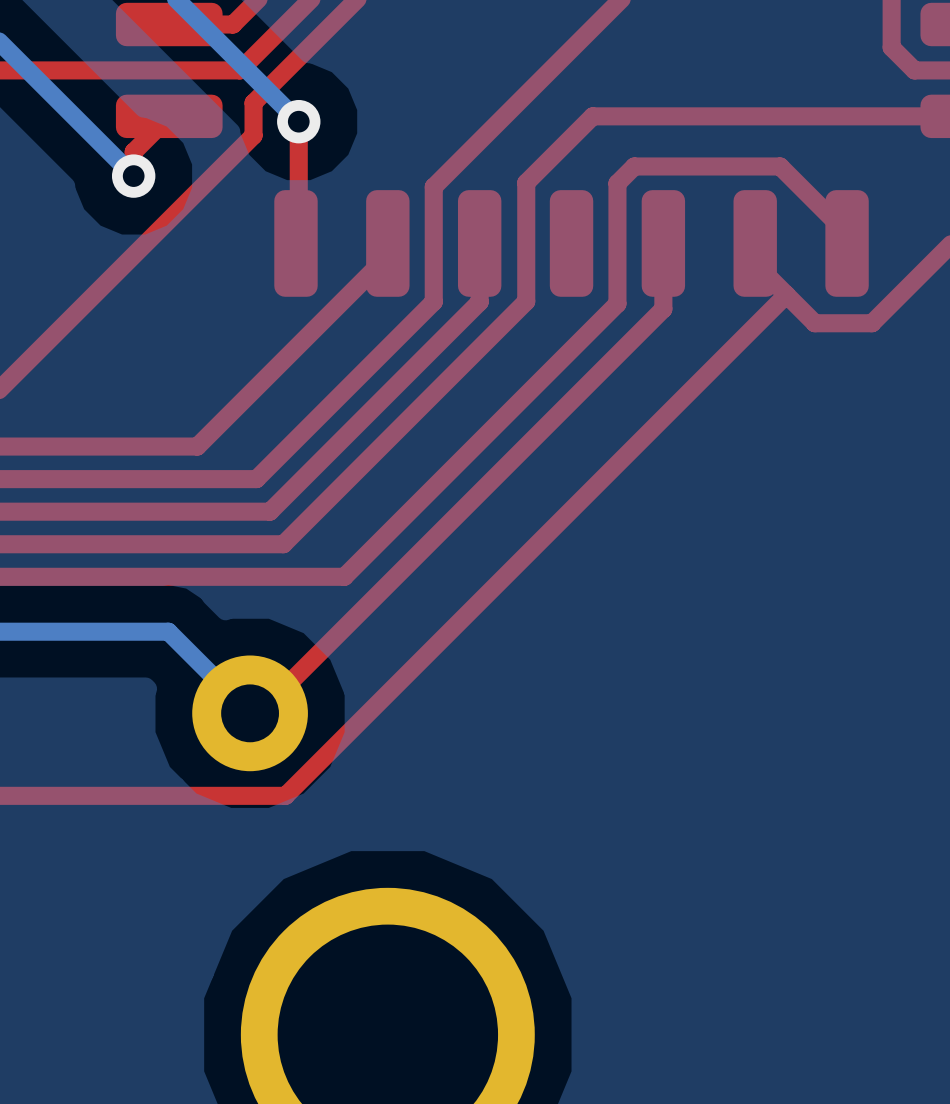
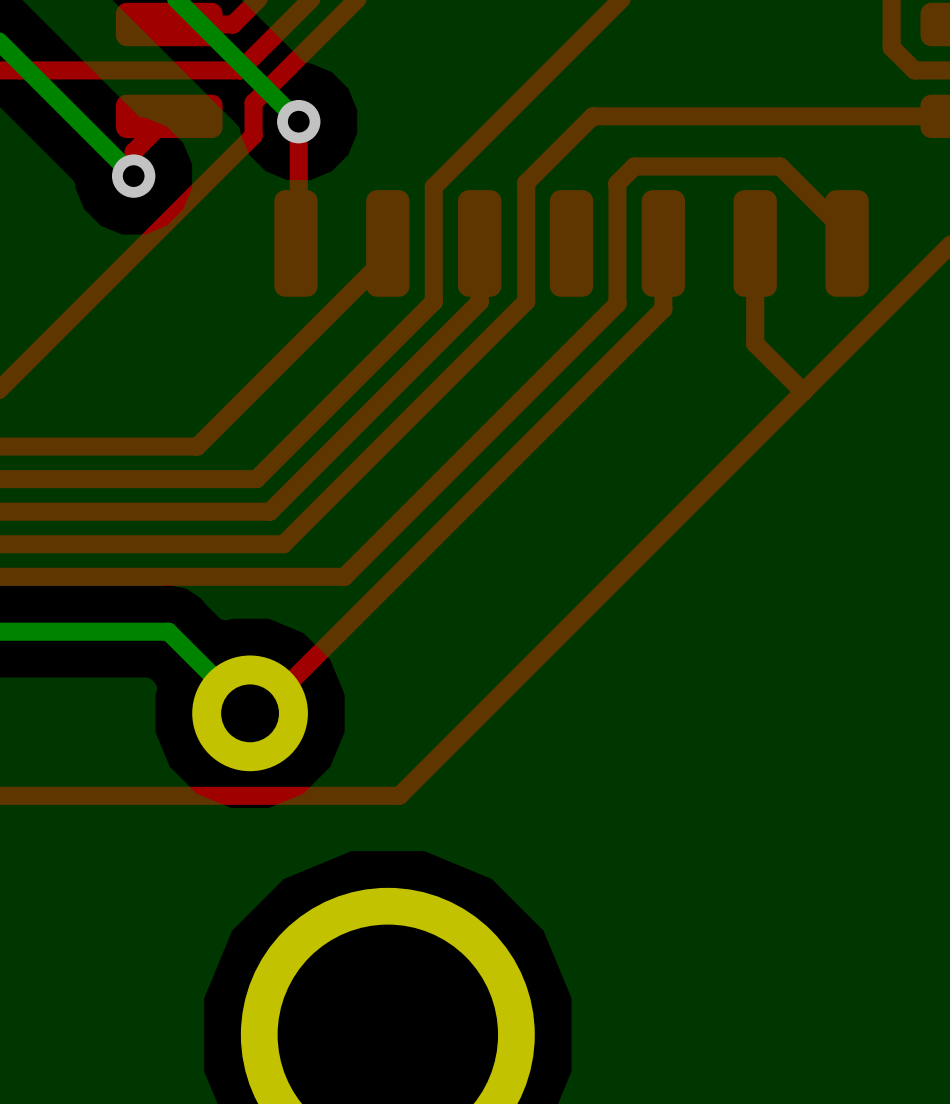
top track: (755, 263) (814, 323) (872, 323) -> (755, 263) (755, 343) (803, 391)
top track: (786, 294) (285, 795) -> (872, 323) (399, 795) (285, 795)

